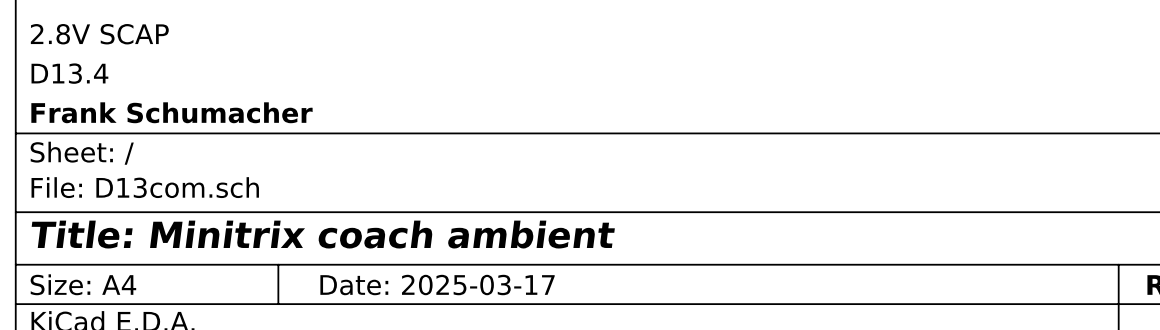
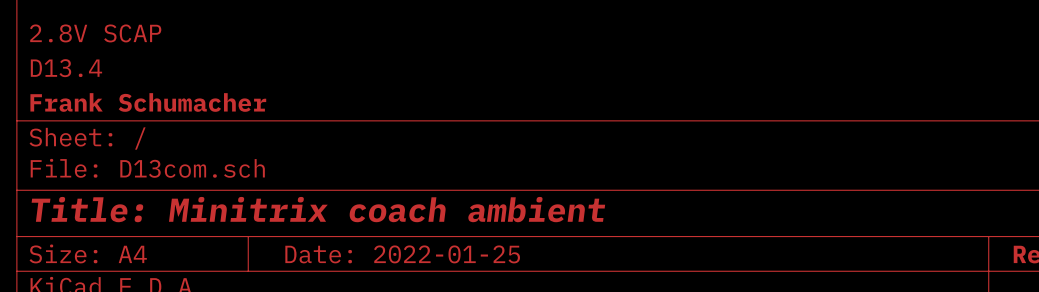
title block: Date: 2025-03-17 (437, 285) -> Date: 2022-01-25 (402, 254)

